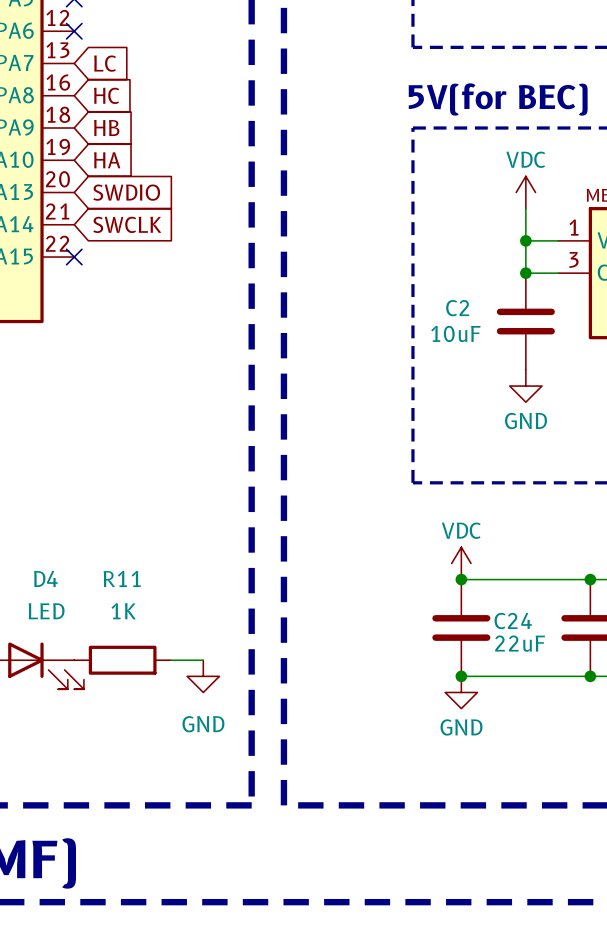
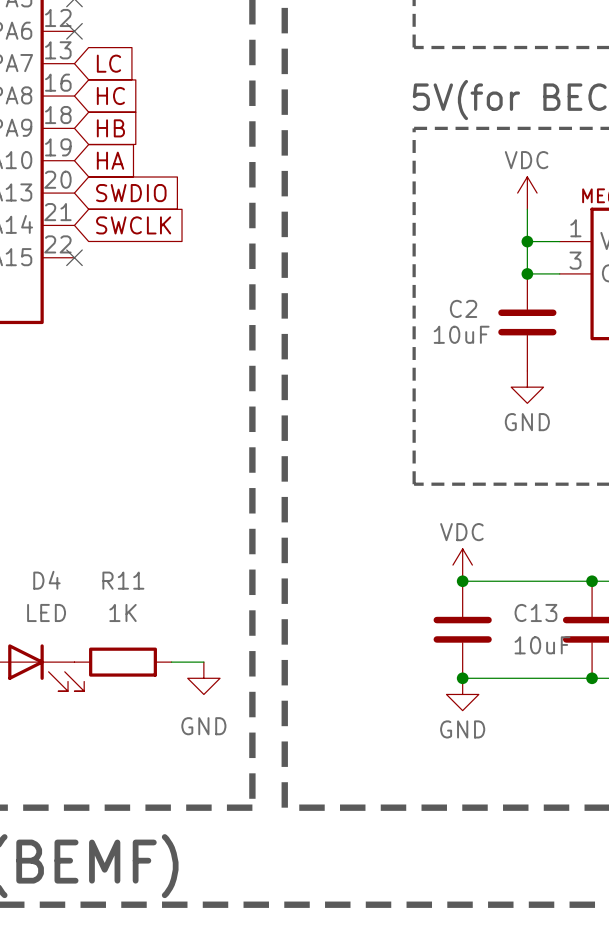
C24 name: C24 (513, 621) -> C13 (535, 612)
C24 value: 22uF (520, 643) -> 10uF (542, 645)

